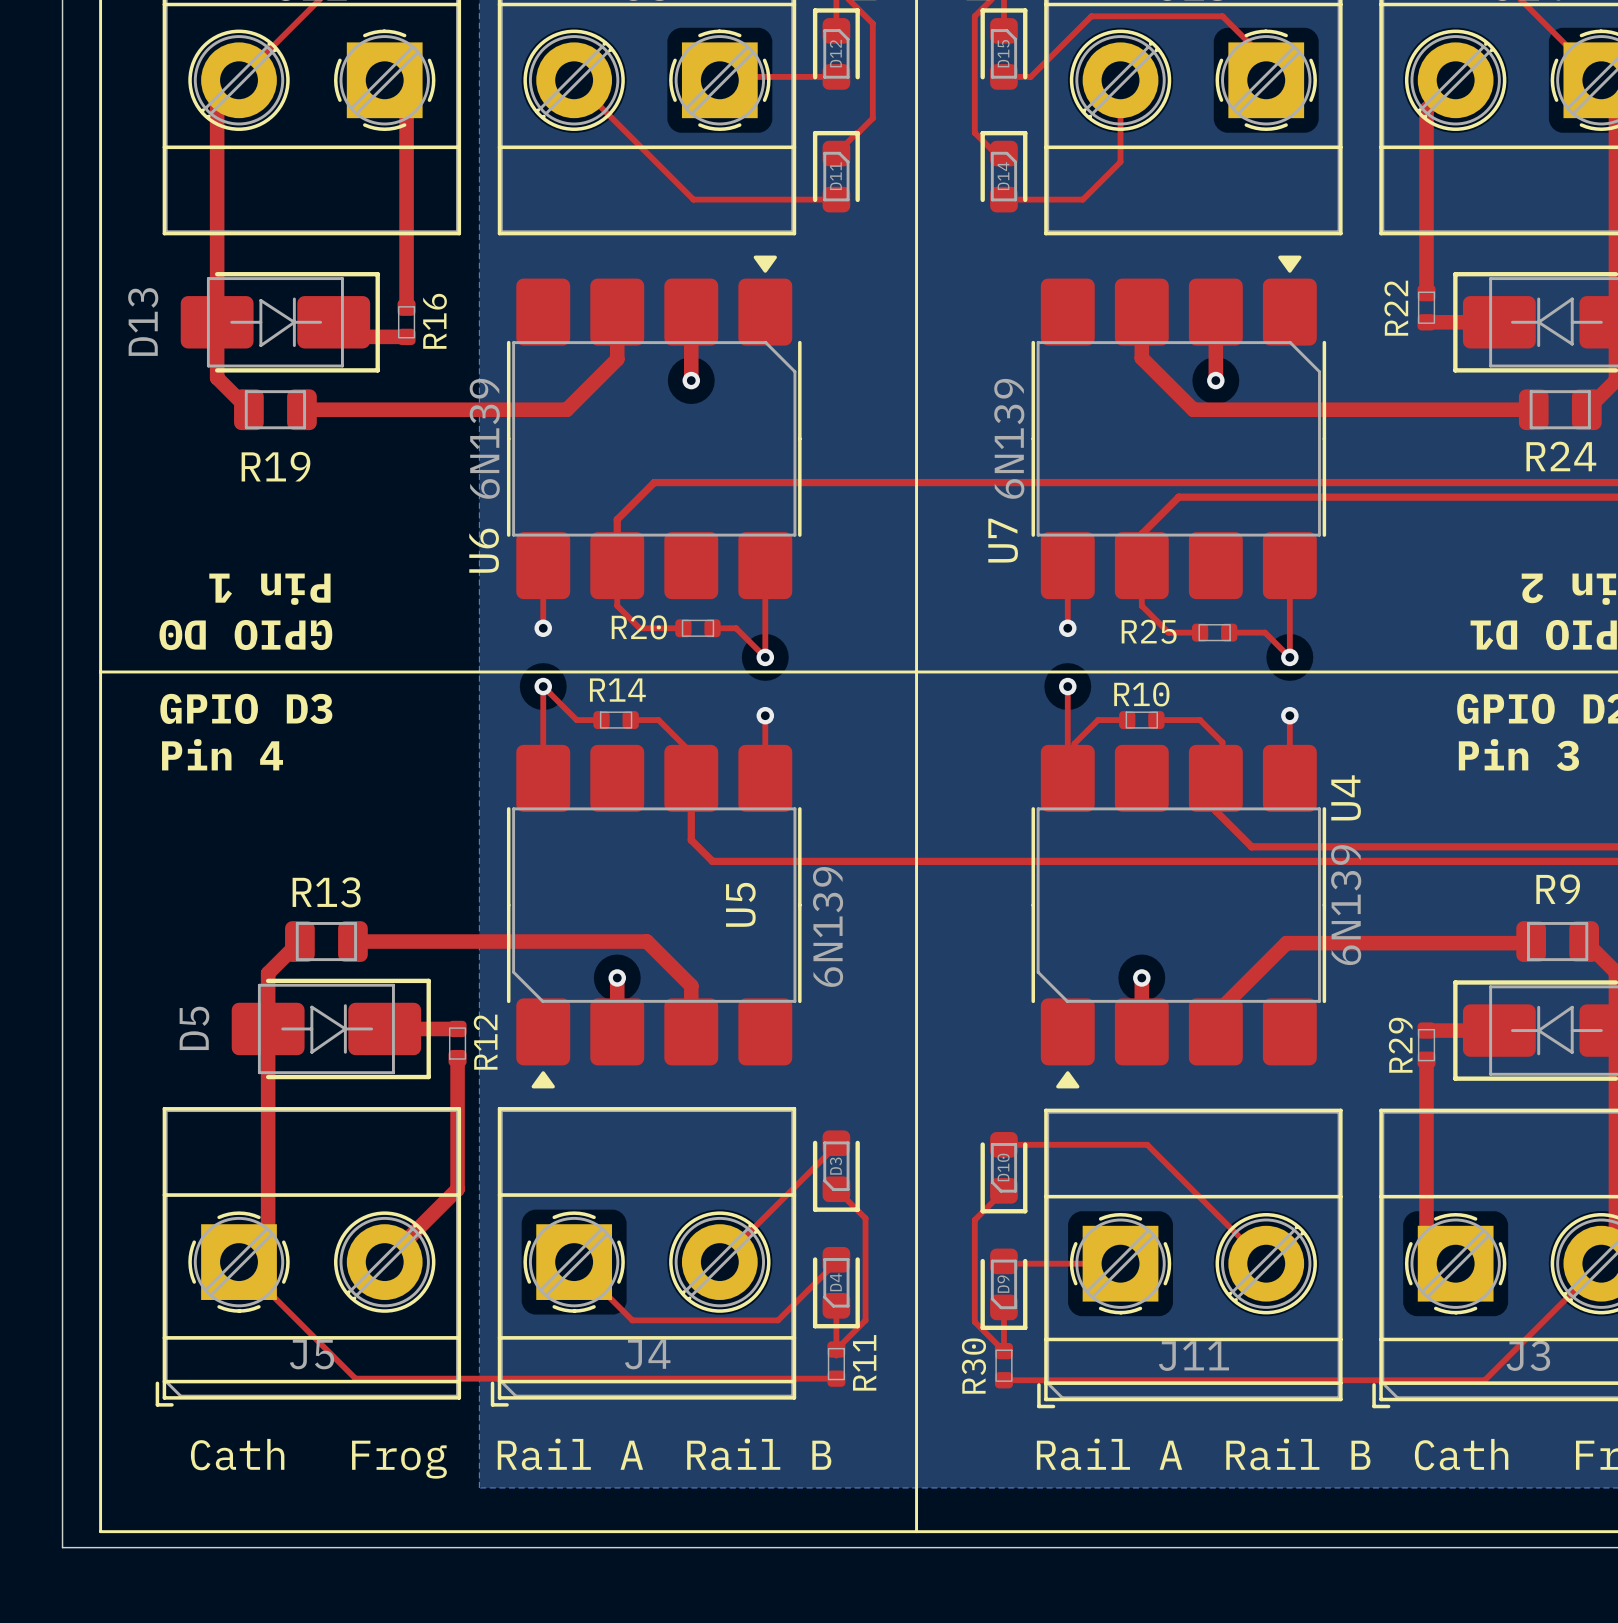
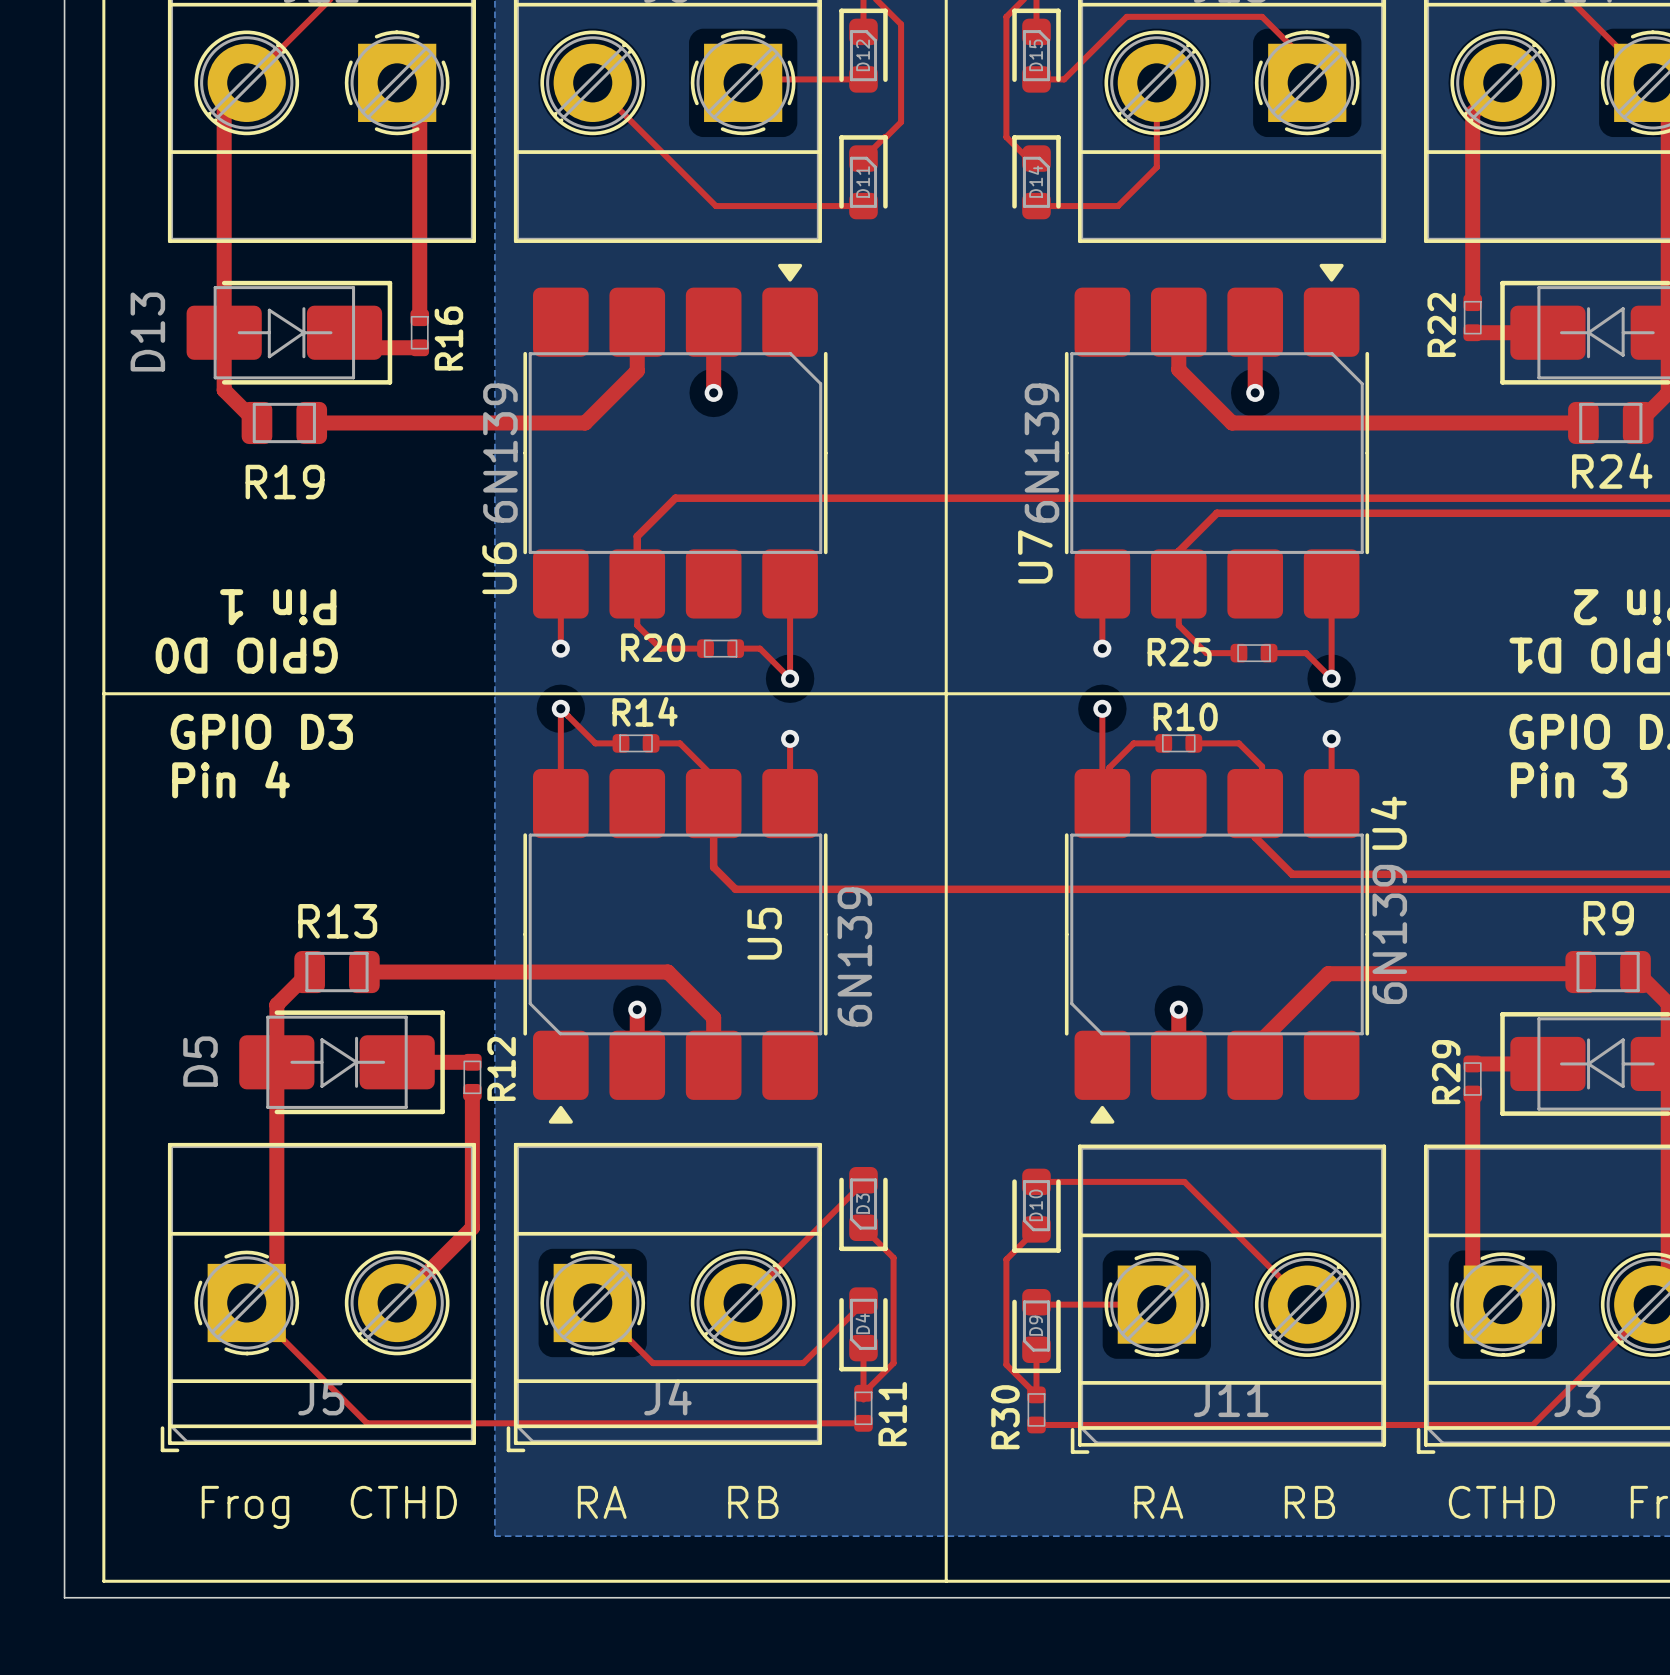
text: Cath (237, 1454) -> Frog (245, 1507)
text: Rail A (570, 1454) -> none
text: Rail B (759, 1454) -> RB (753, 1502)
text: Rail A (1109, 1454) -> none
text: Rail B (1298, 1454) -> RB (1309, 1502)
text: Cath (1461, 1454) -> CTHD (1501, 1502)
text: none -> RA (602, 1502)
text: none -> RA (1158, 1502)
text: Frog (399, 1459) -> CTHD (403, 1502)

